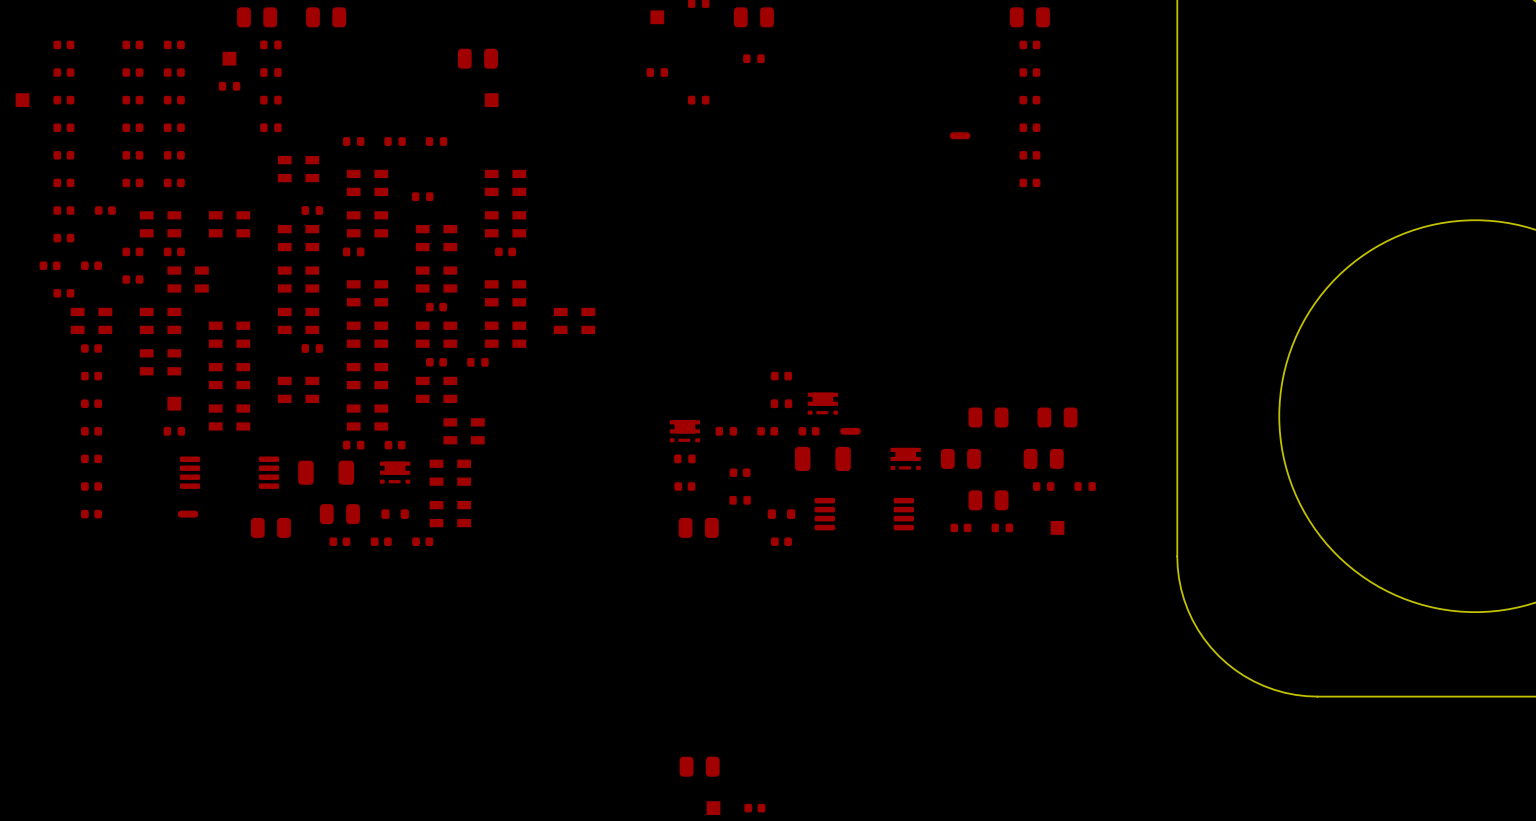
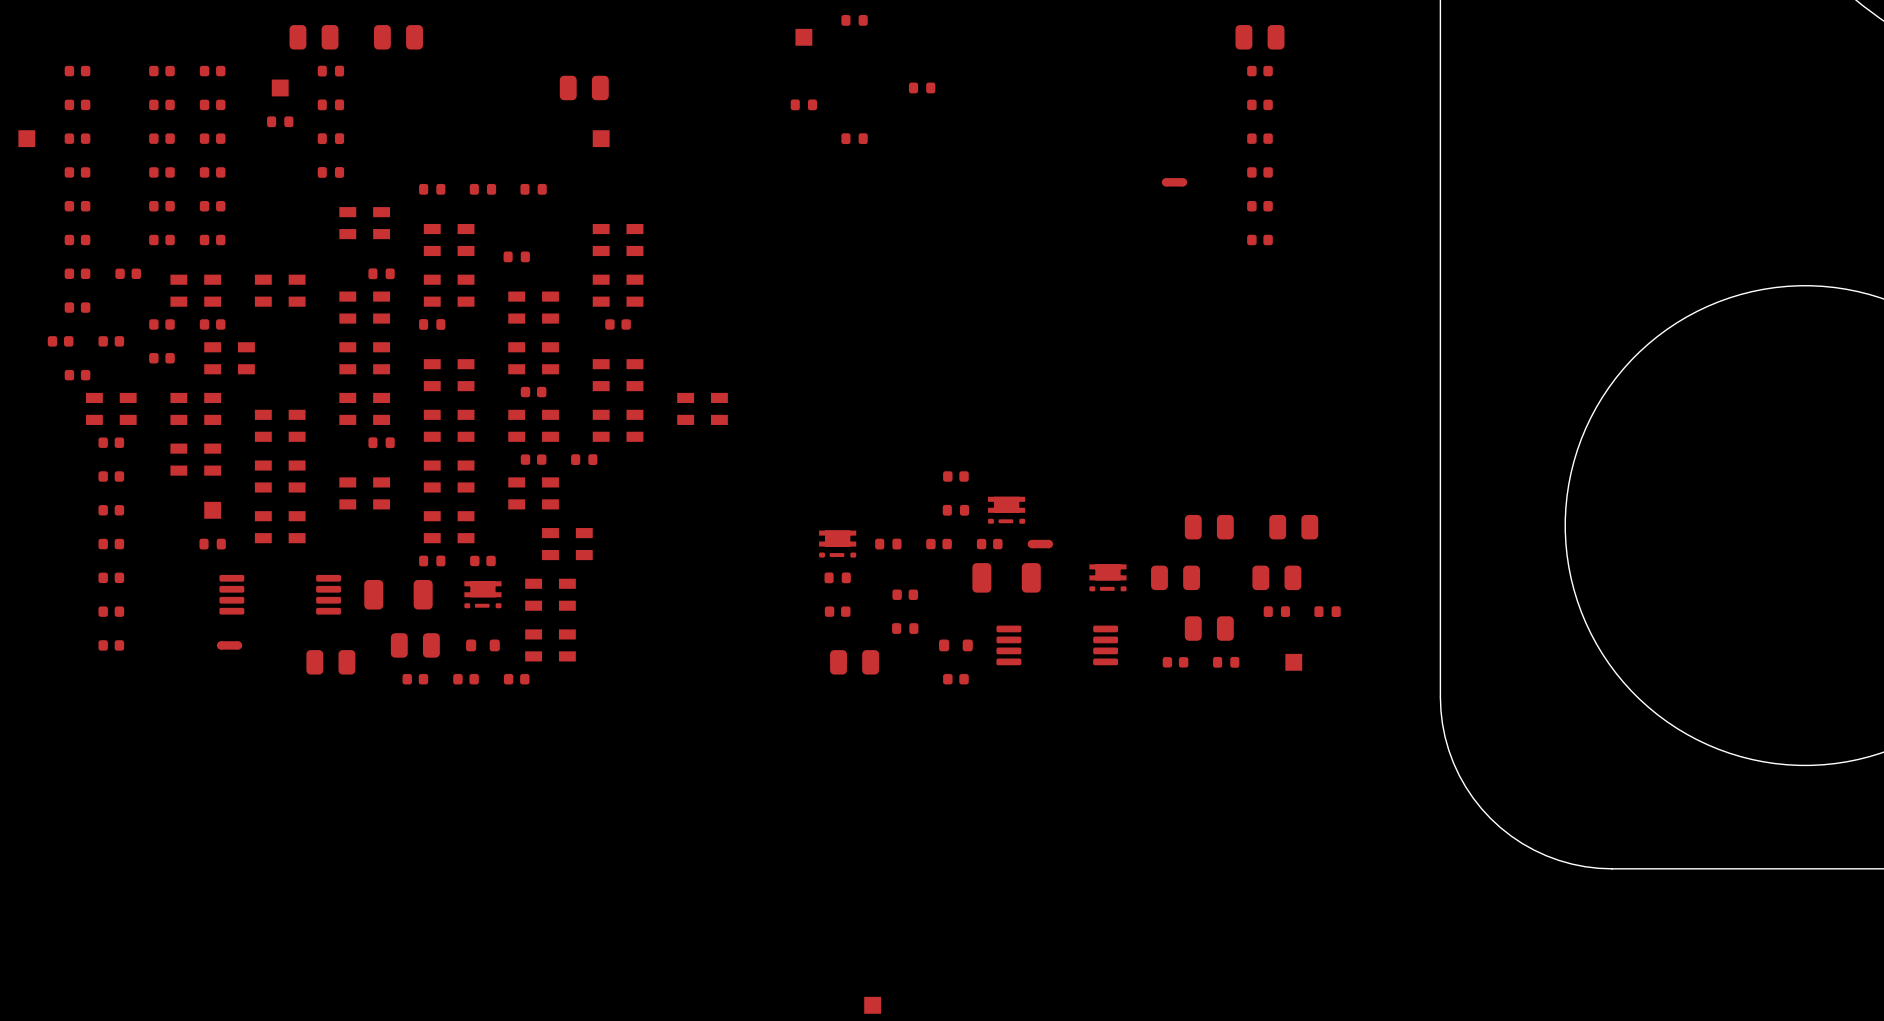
part: (753, 17) -> none
part: (699, 766) -> none
part: (754, 808) -> none

